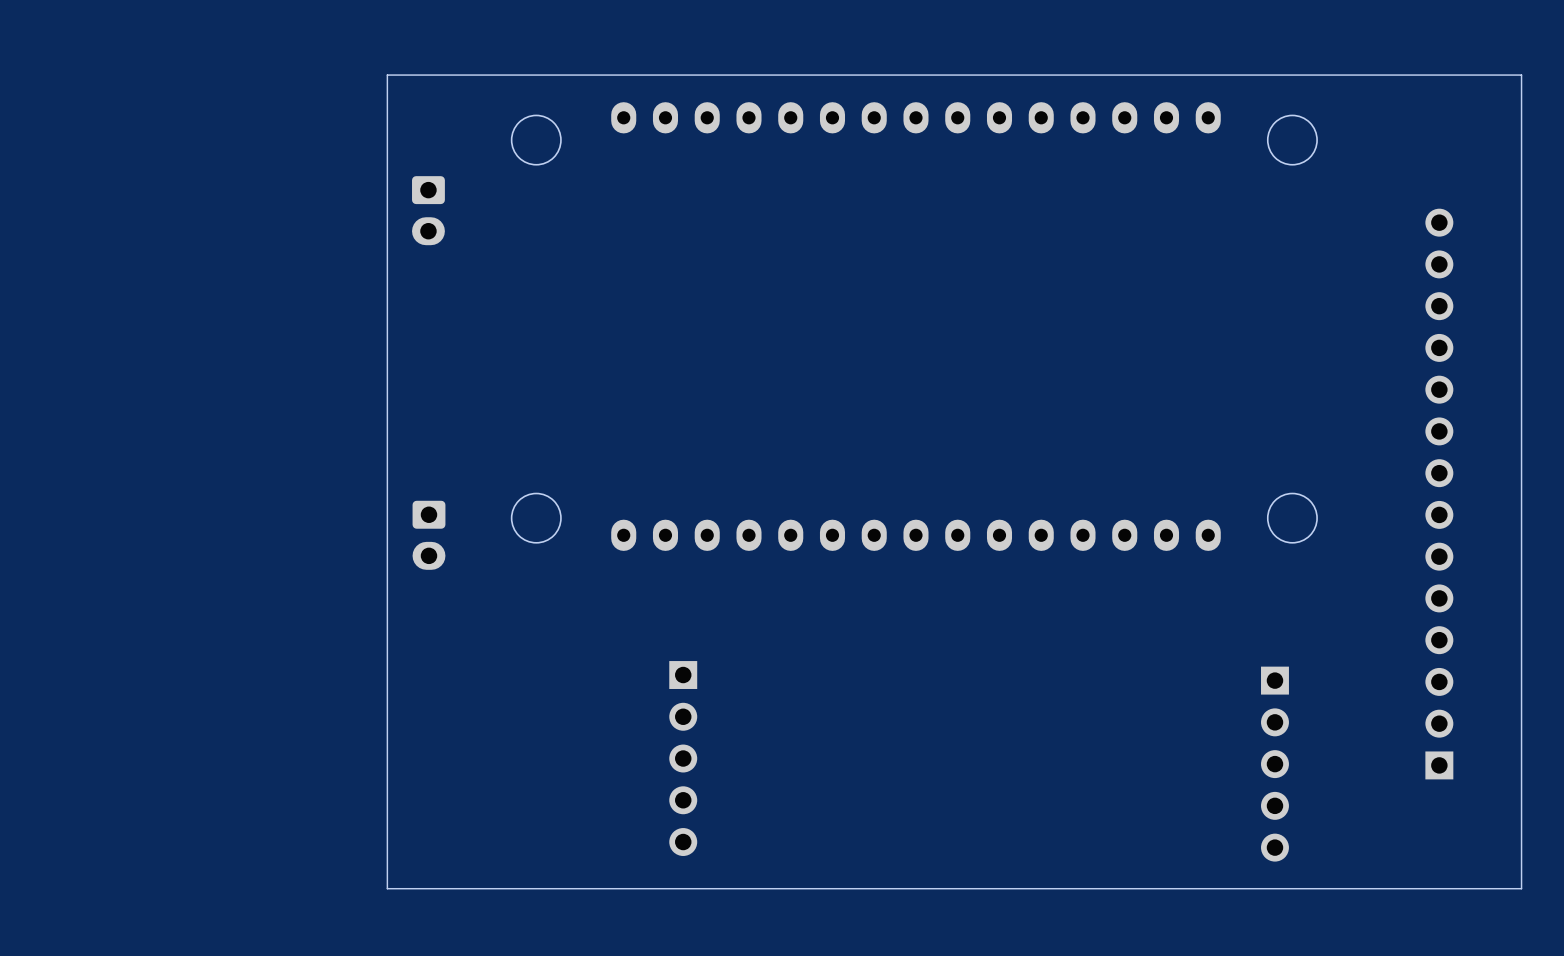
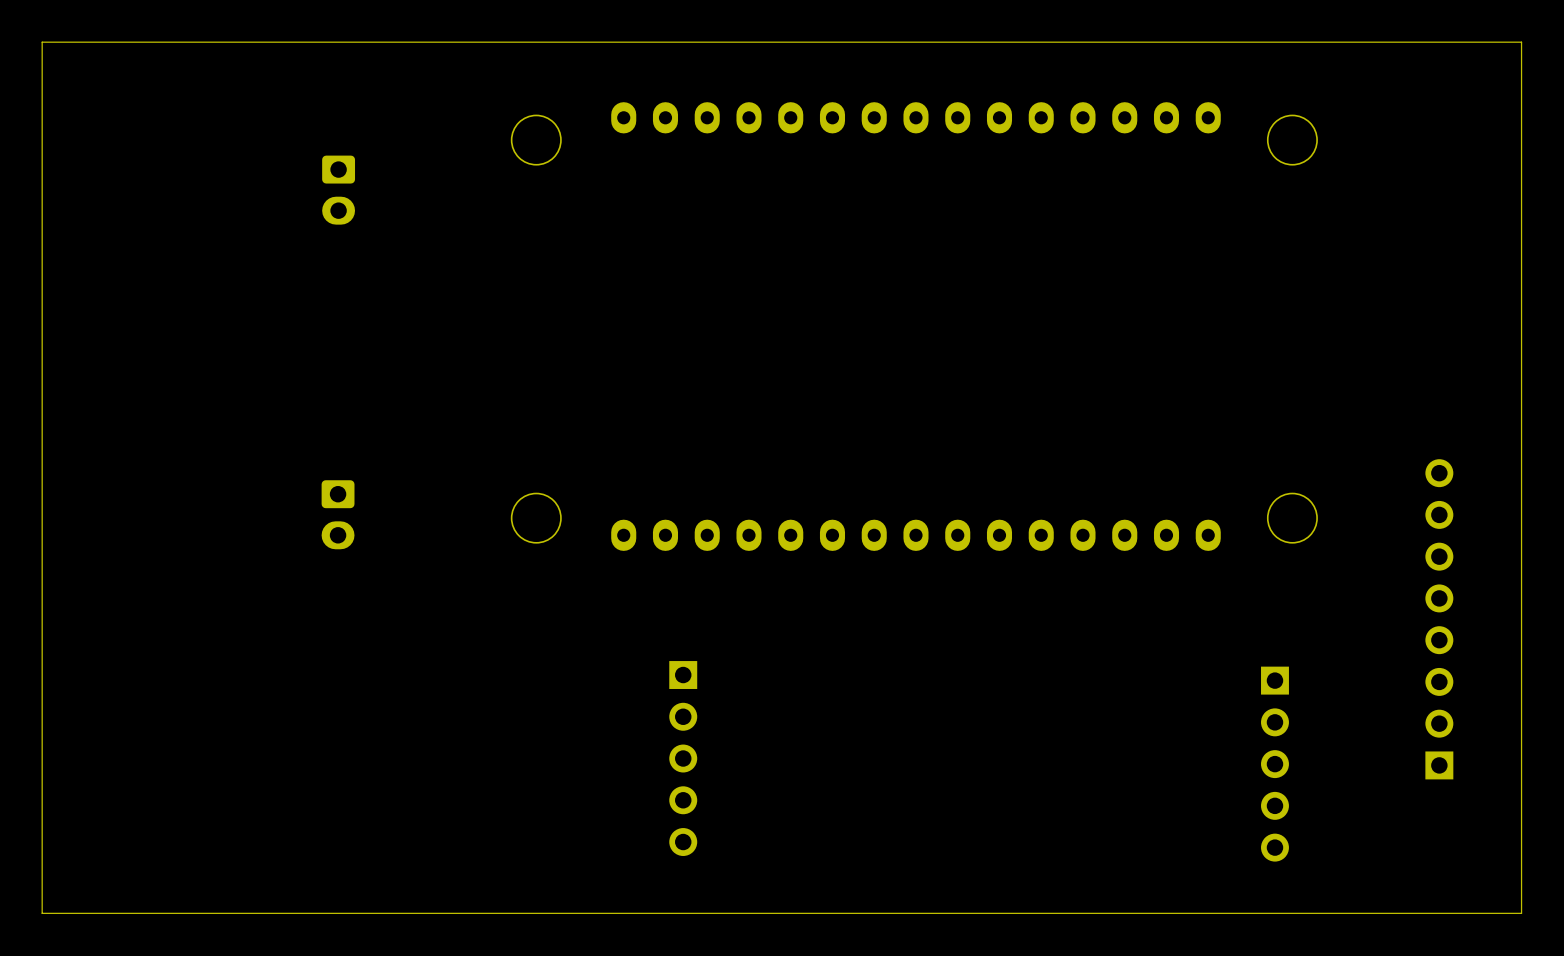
board edge: (1521, 75) (387, 75) (387, 888) (1521, 888) -> (1521, 75) (1521, 42) (42, 42) (42, 913) (1521, 913) (1521, 888)
part position: (428, 210) -> (338, 190)
part: (1439, 494) -> none
part position: (428, 535) -> (338, 514)

